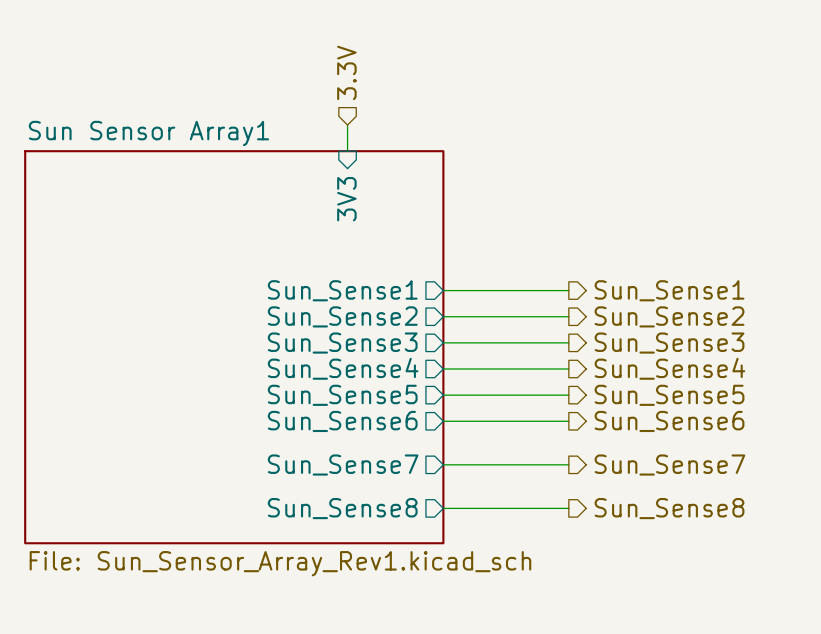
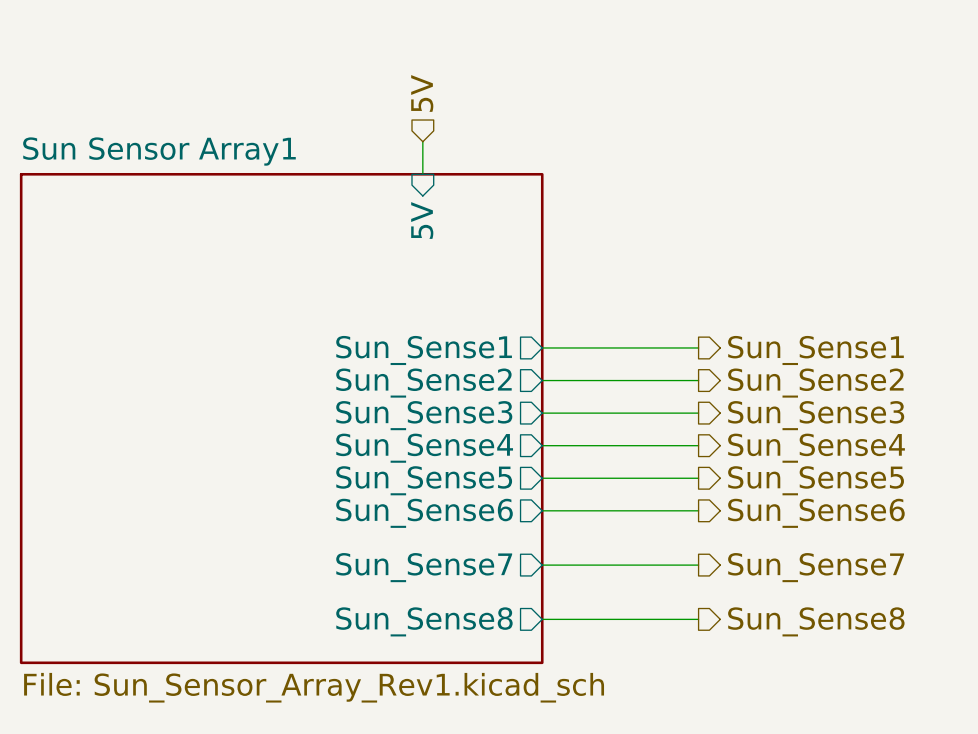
hierarchical label: 3.3V (346, 72) -> 5V (422, 93)
sheet pin: 3V3 (346, 199) -> 5V (422, 220)

